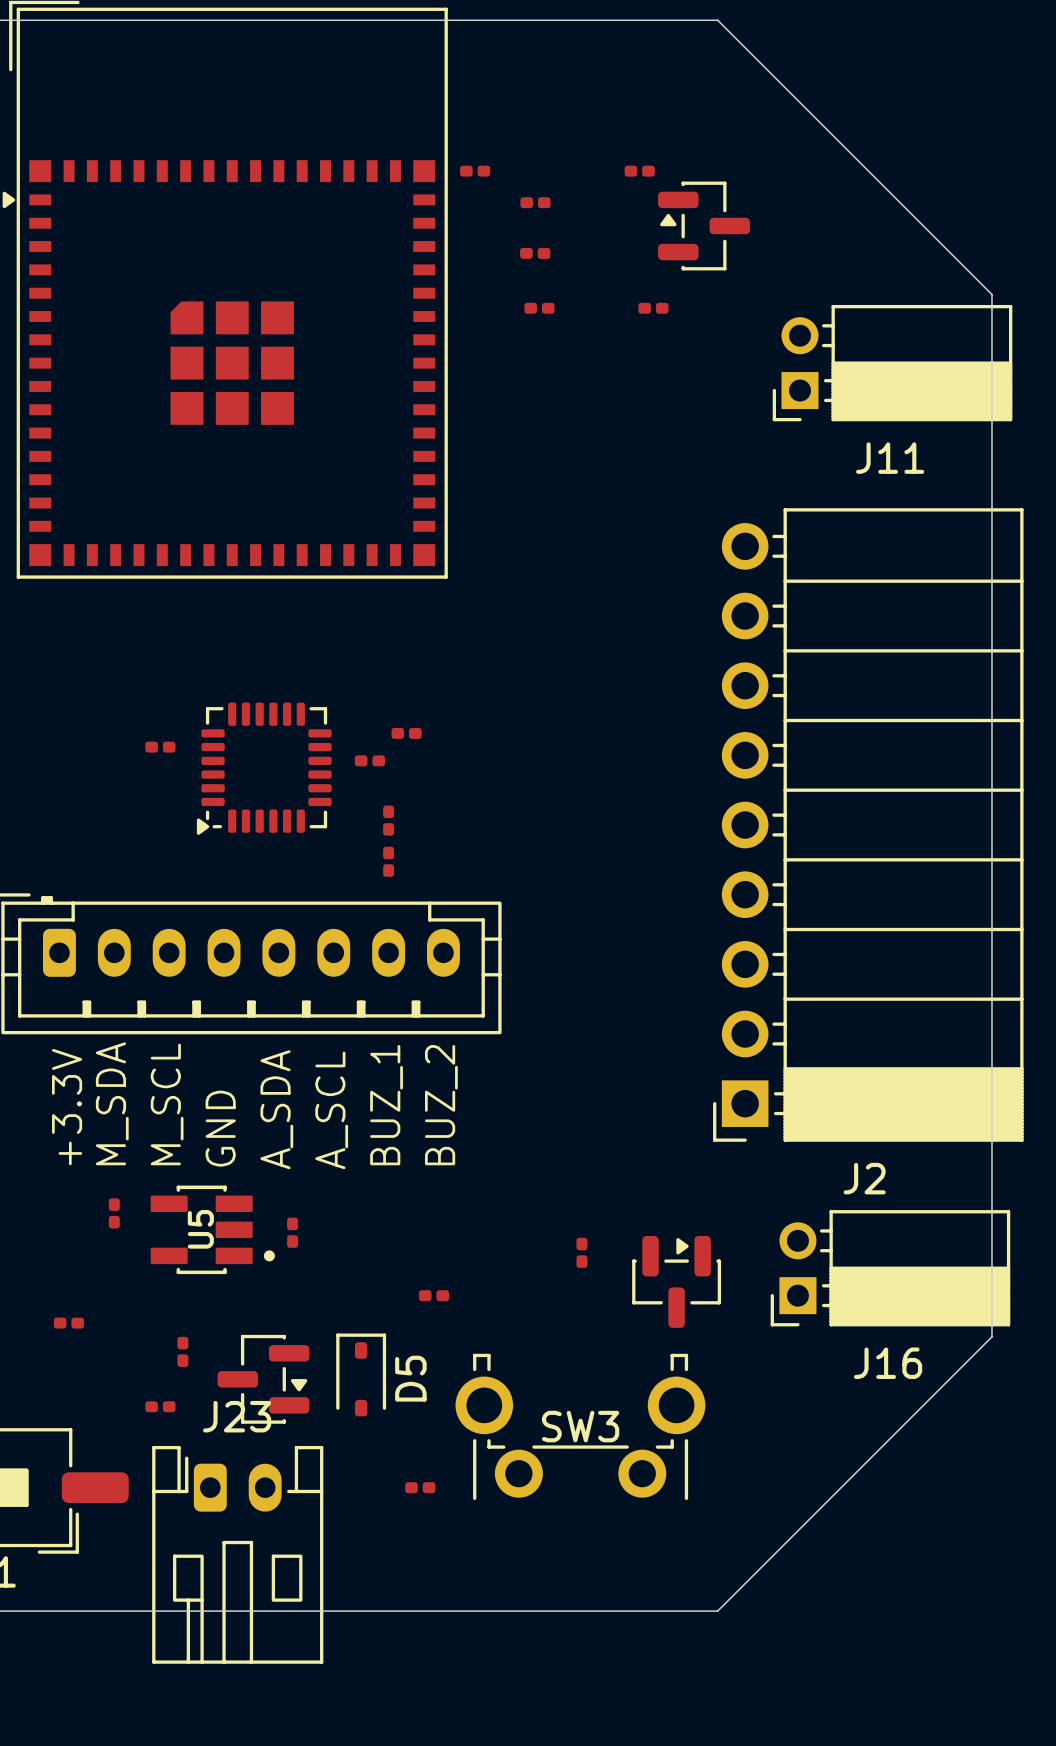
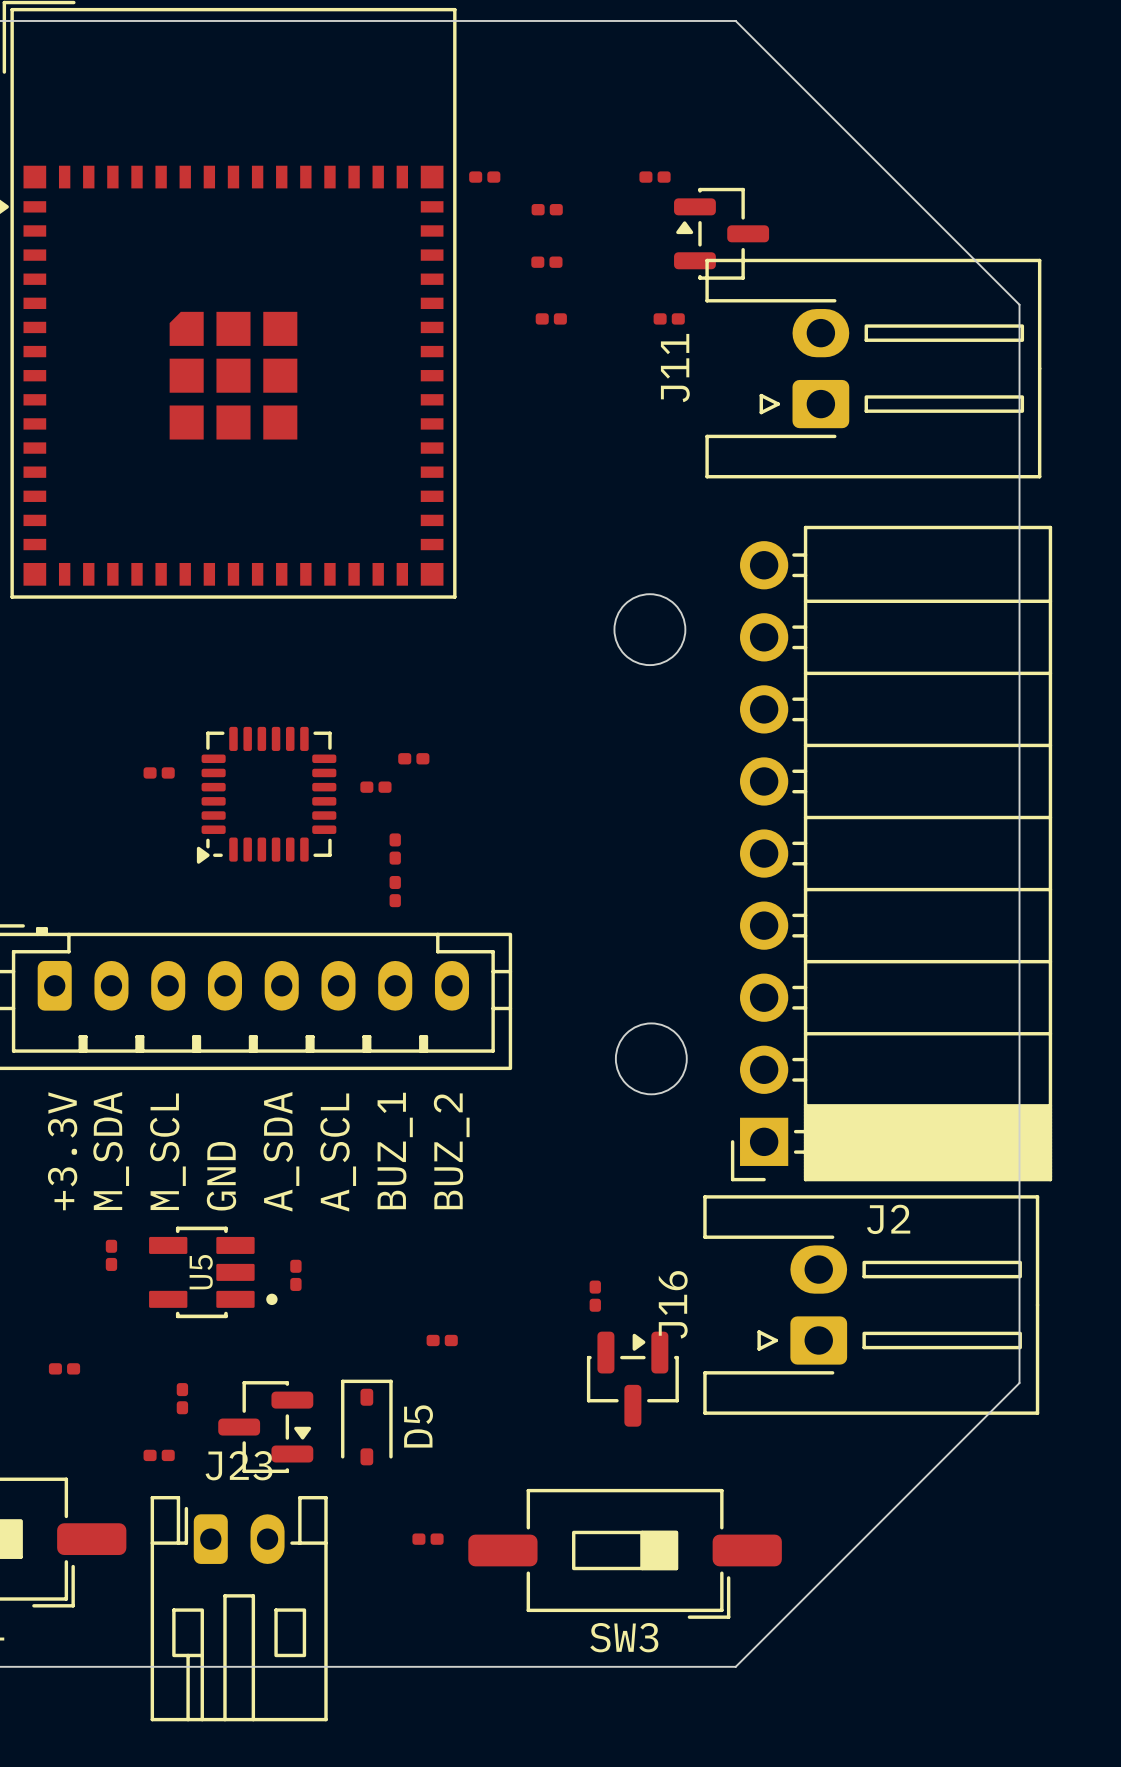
J11 footprint: [772, 304, 1013, 422] -> [705, 258, 1042, 479]
J11 name position: J11 (890, 458) -> J11 (675, 368)
round board edge: none -> [613, 593, 687, 666]
round board edge: none -> [615, 1022, 688, 1096]
J16 footprint: [770, 1210, 1011, 1327] -> [703, 1195, 1040, 1415]
part position: (676, 1281) -> (632, 1379)
SW3 footprint: [455, 1353, 706, 1501] -> [468, 1488, 782, 1619]
J16 name position: J16 (888, 1363) -> J16 (673, 1304)
SW3 name position: SW3 (580, 1426) -> SW3 (624, 1637)

